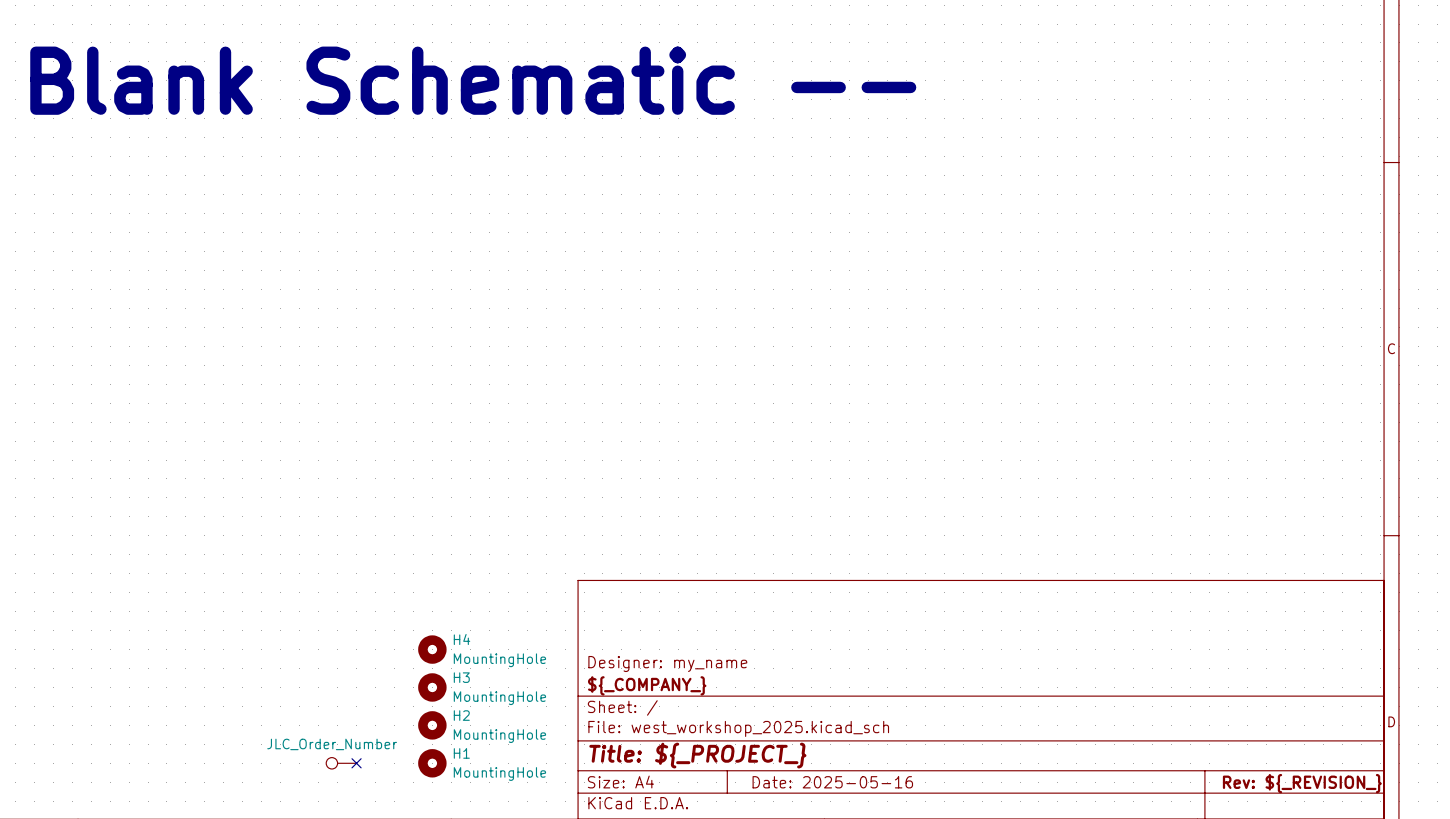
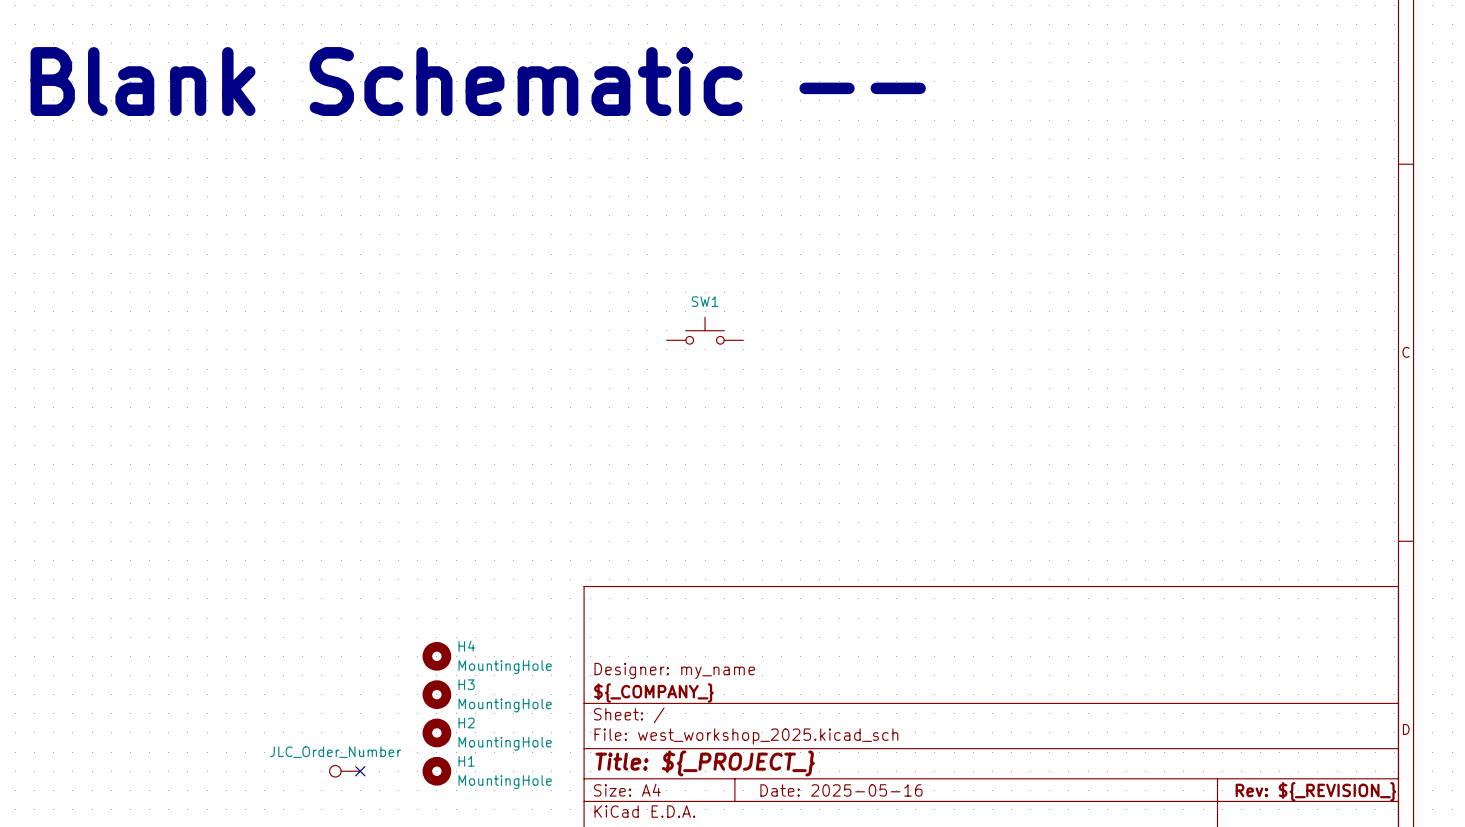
SW1: none -> (705, 330)

